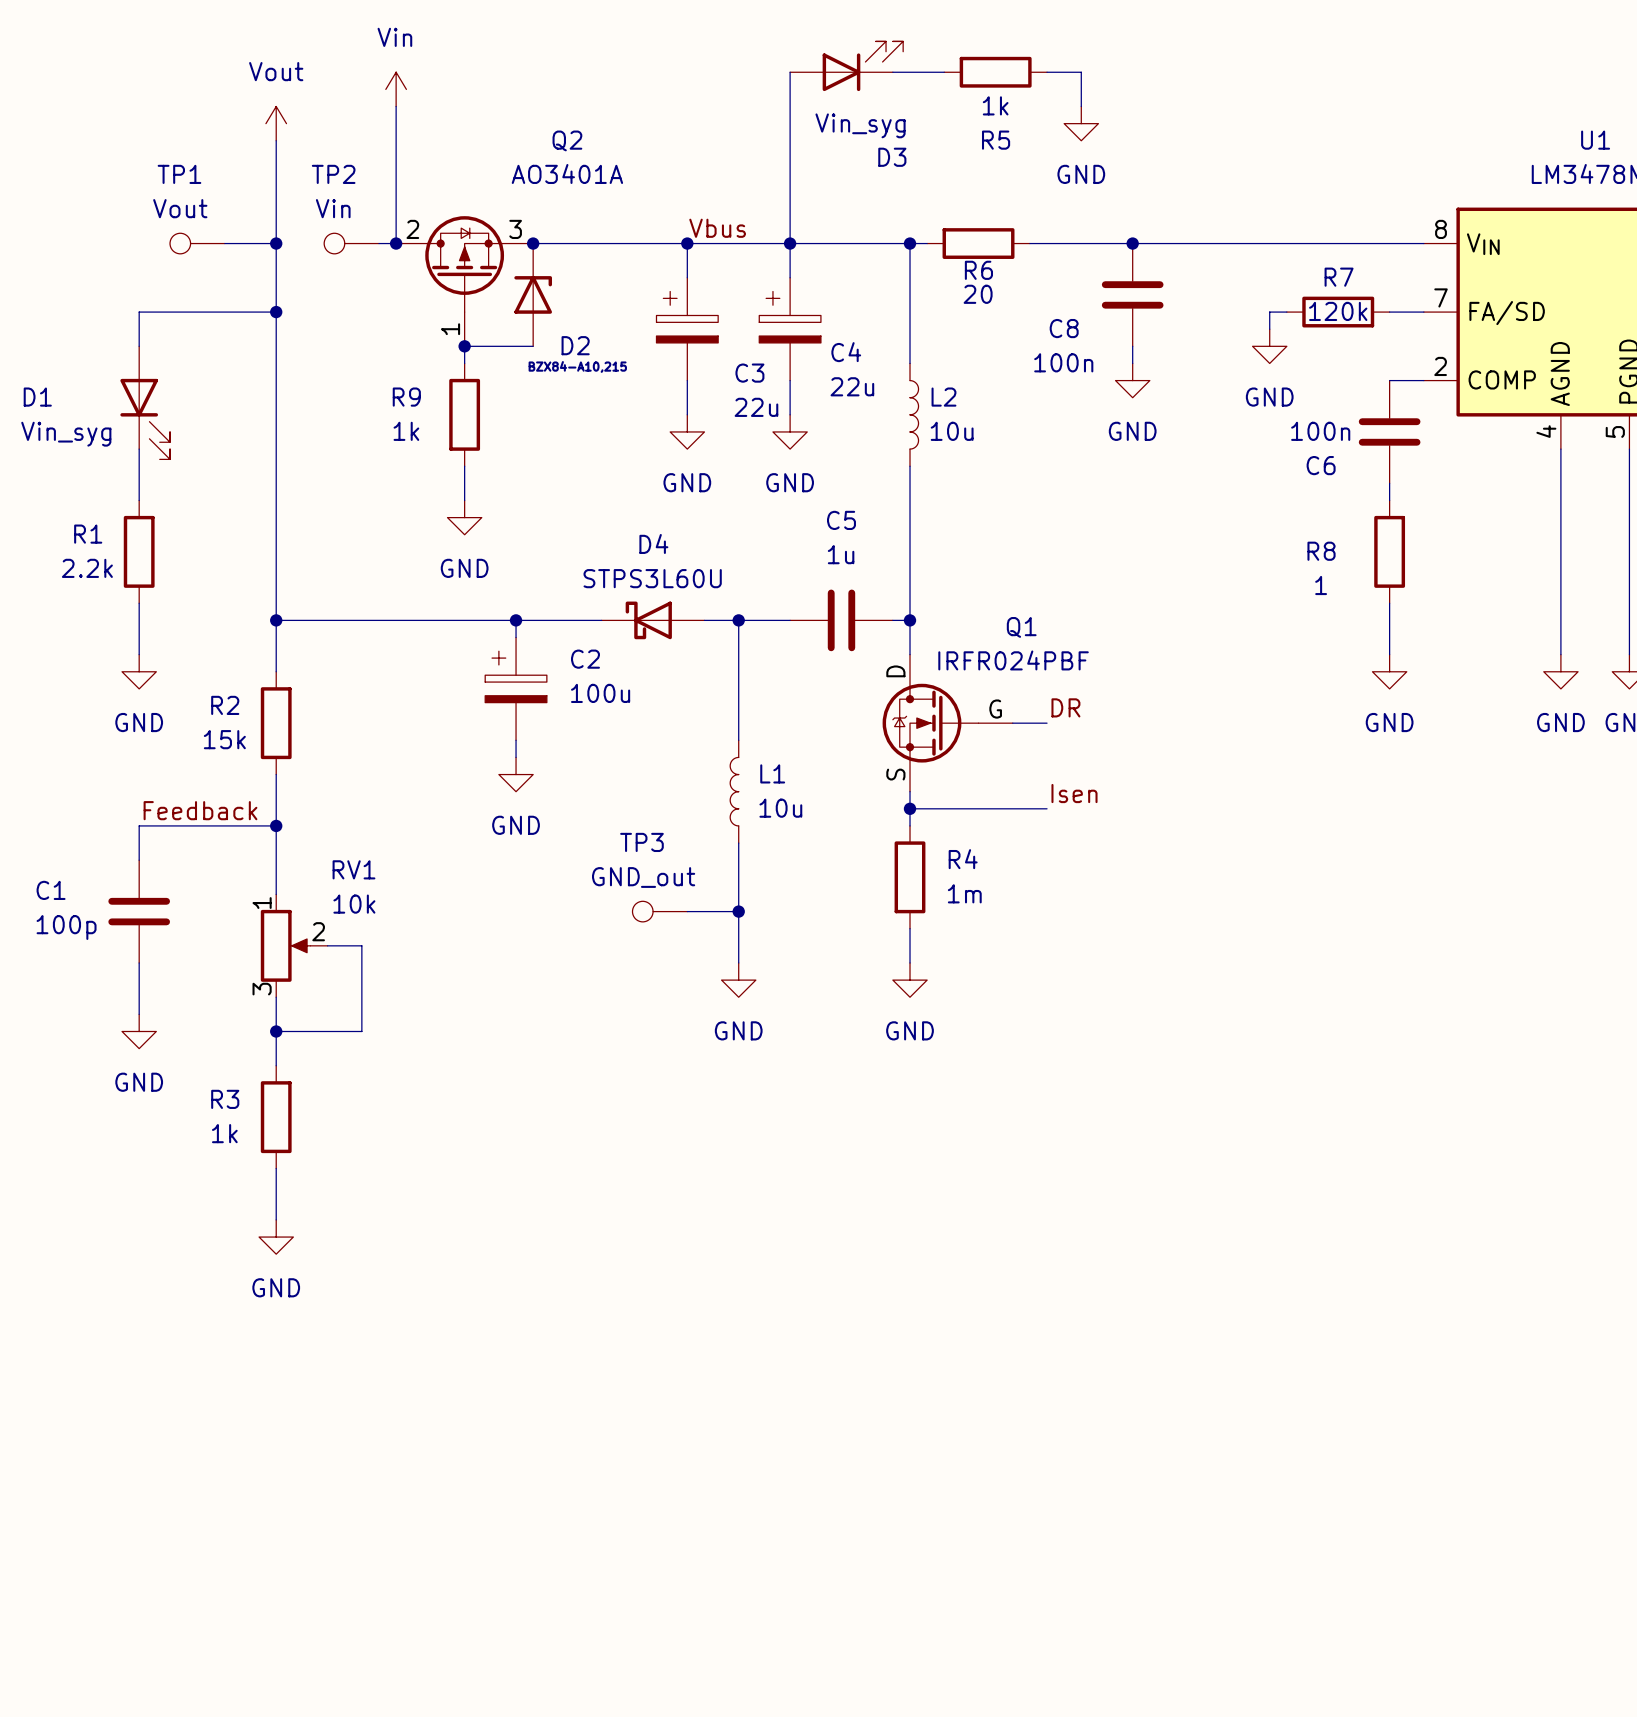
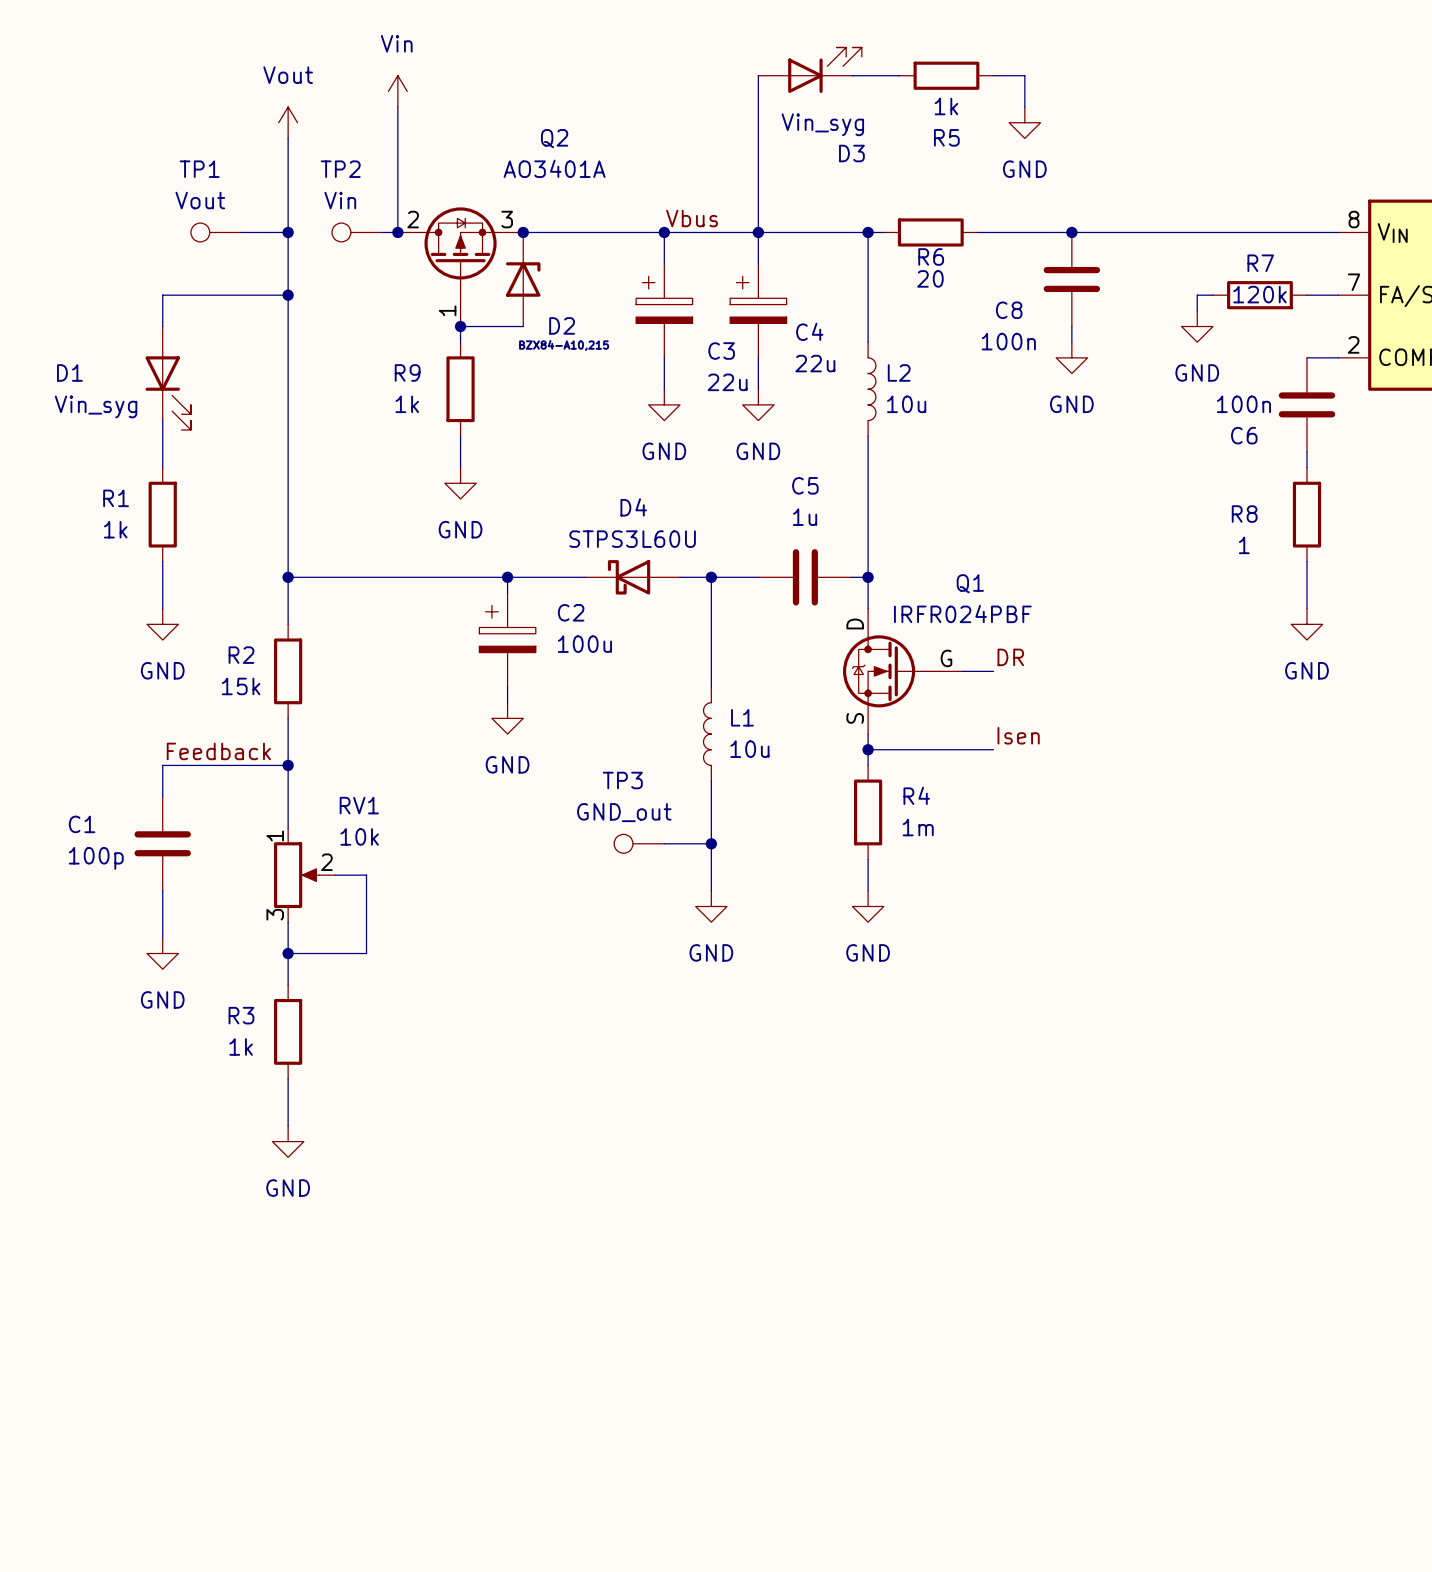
R1 value: 2.2k (87, 568) -> 1k (115, 529)

